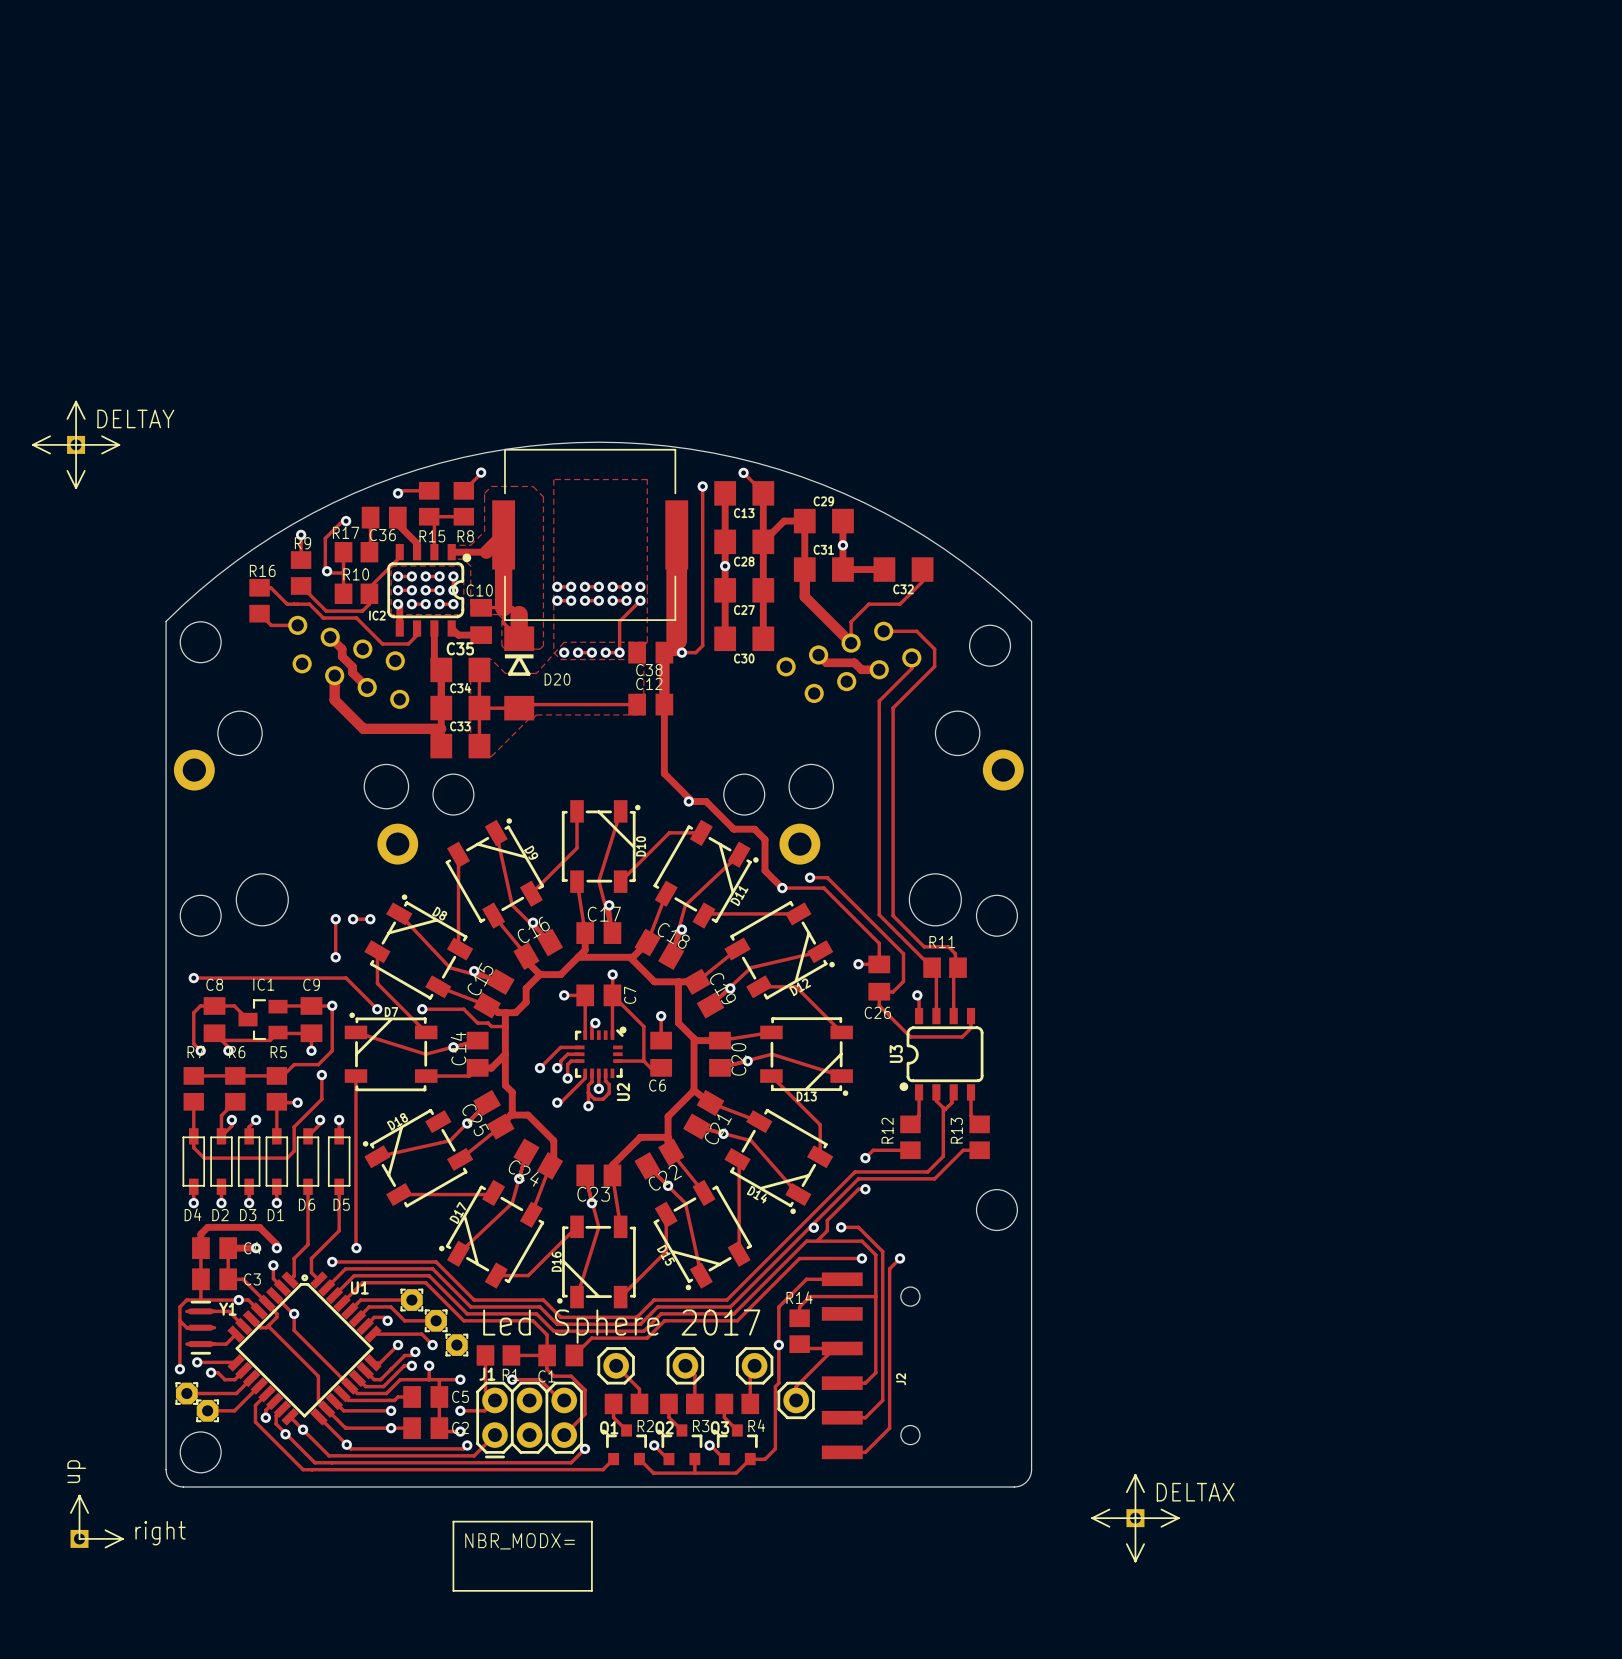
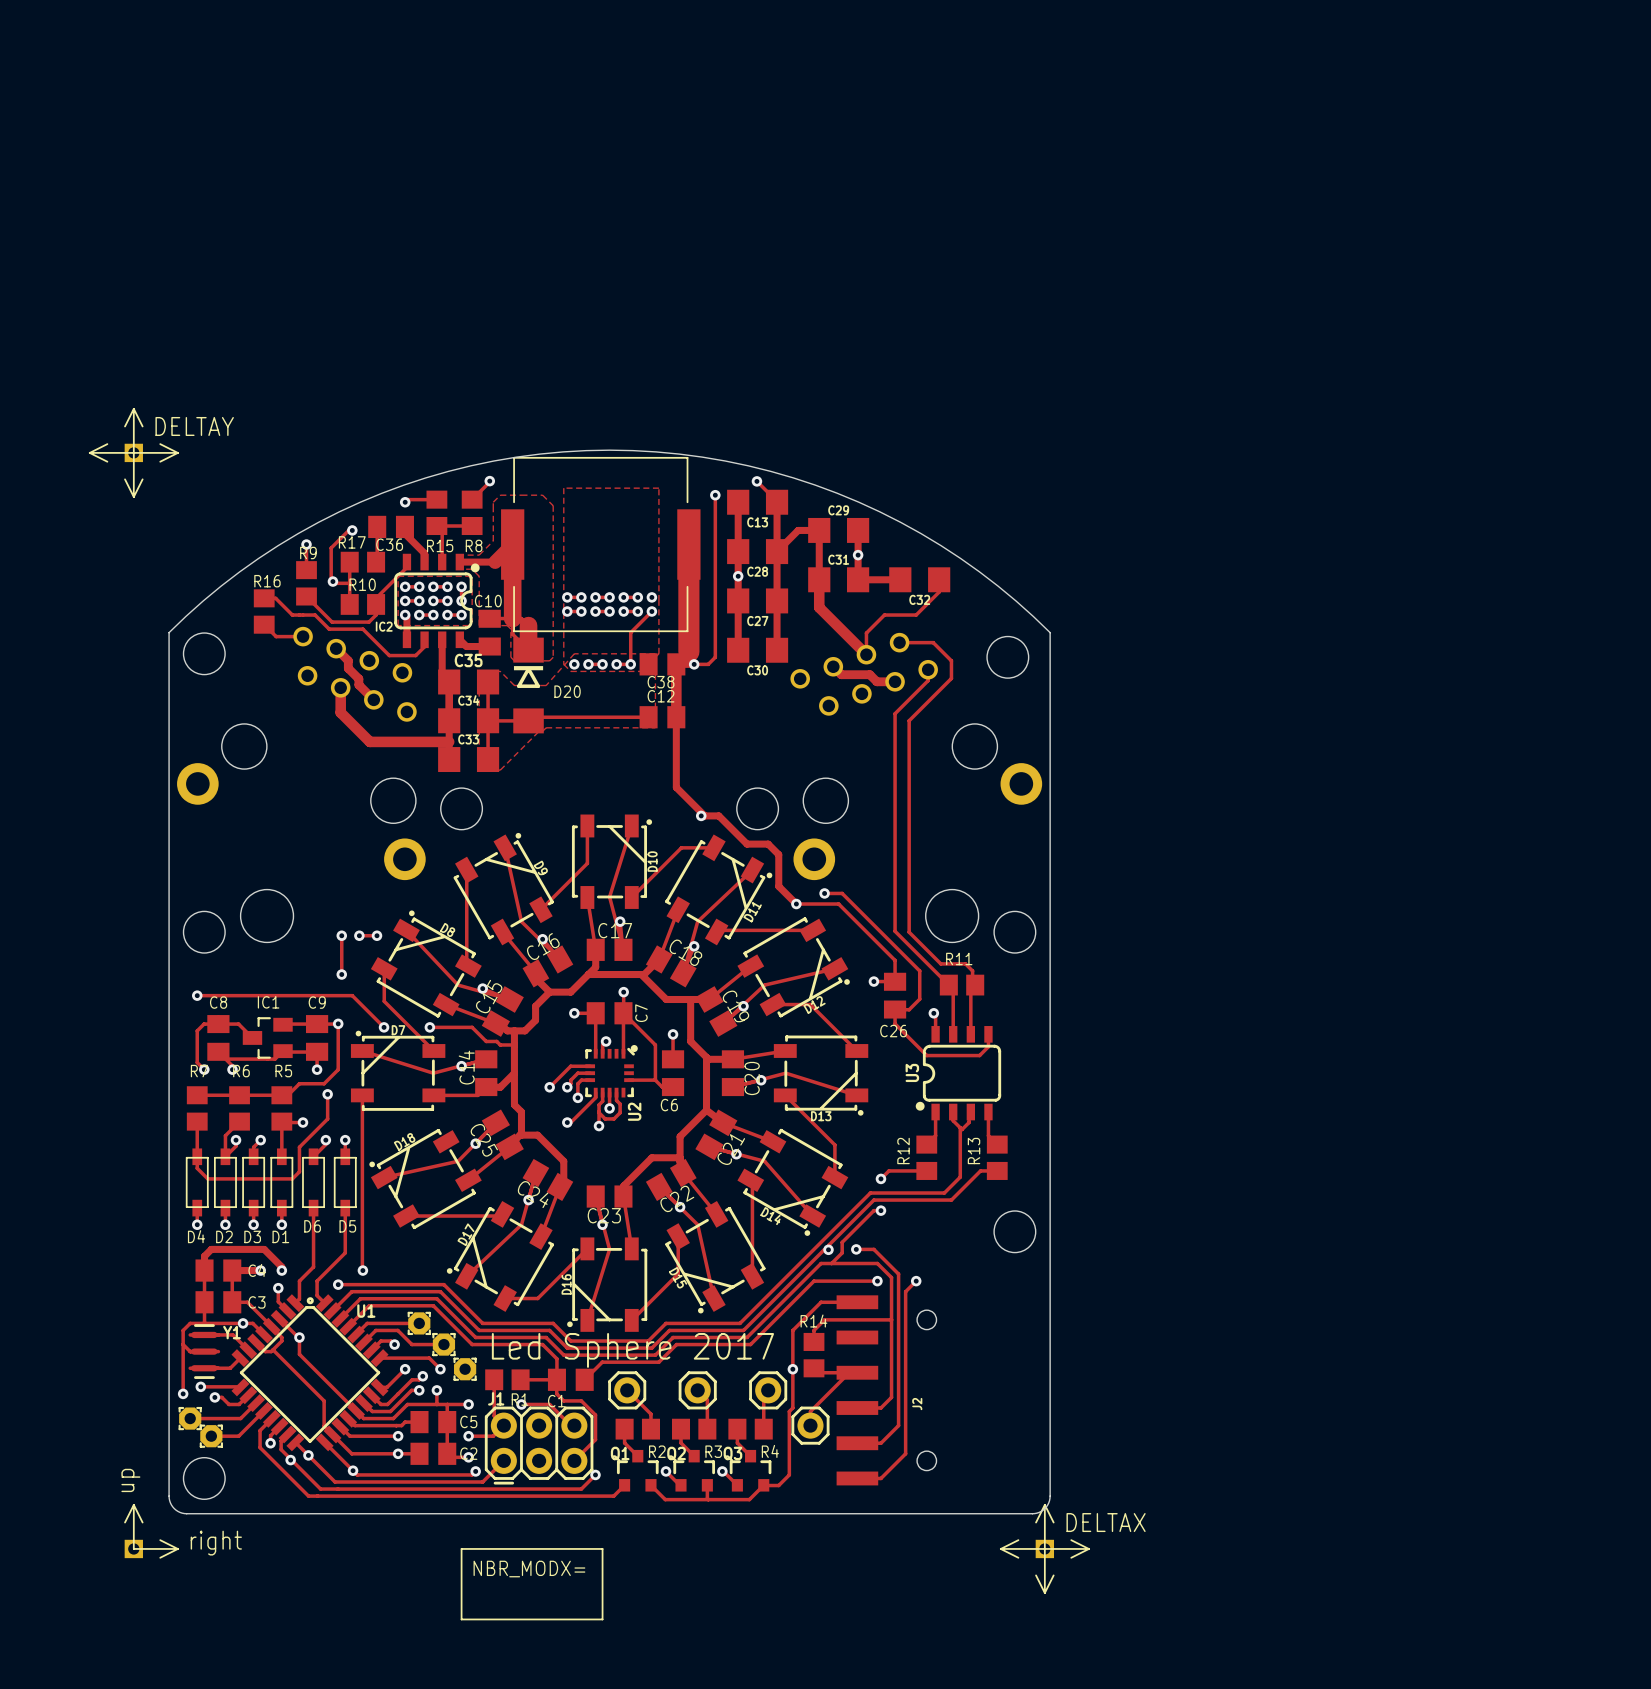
part position: (76, 444) -> (133, 452)
part position: (1135, 1518) -> (1044, 1548)
part position: (96, 1521) -> (151, 1531)

